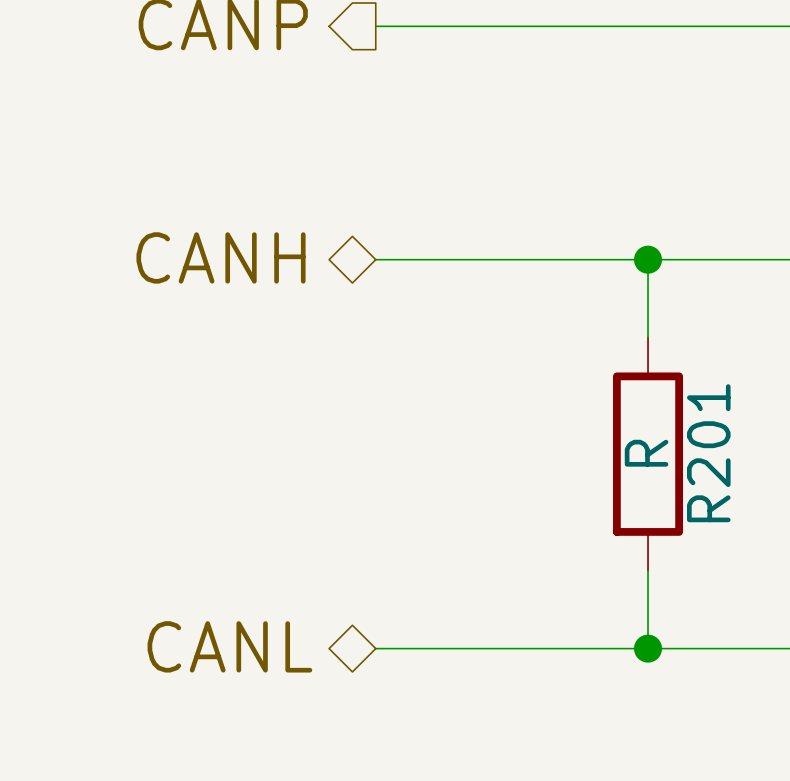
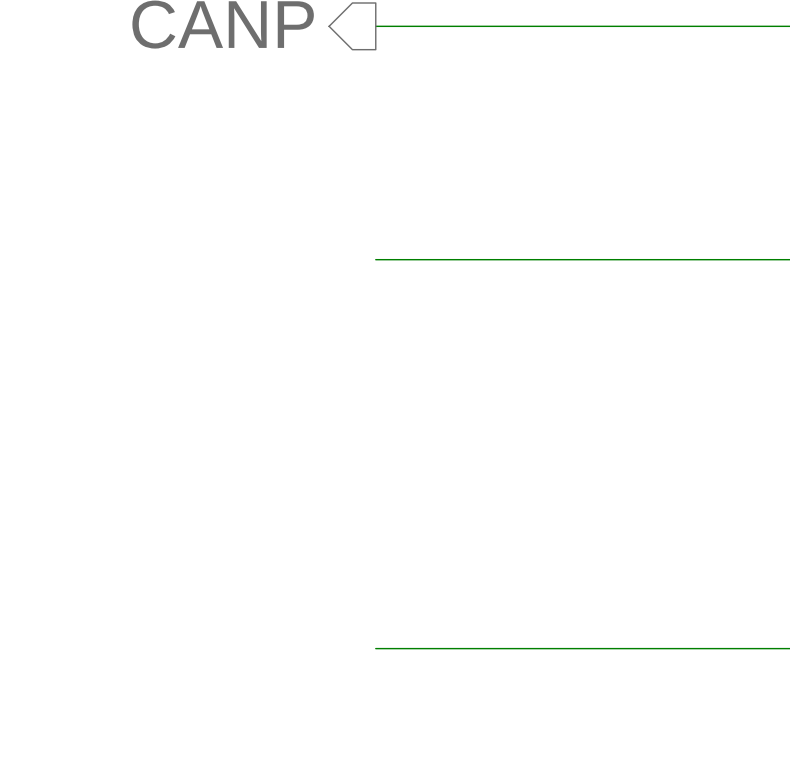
hierarchical label: CANH (221, 257) -> none
wire: (648, 259) (648, 337) -> none
junction: (648, 259) -> none
R201: R (648, 454) -> none
wire: (648, 570) (648, 648) -> none
hierarchical label: CANL (229, 646) -> none
junction: (648, 648) -> none

